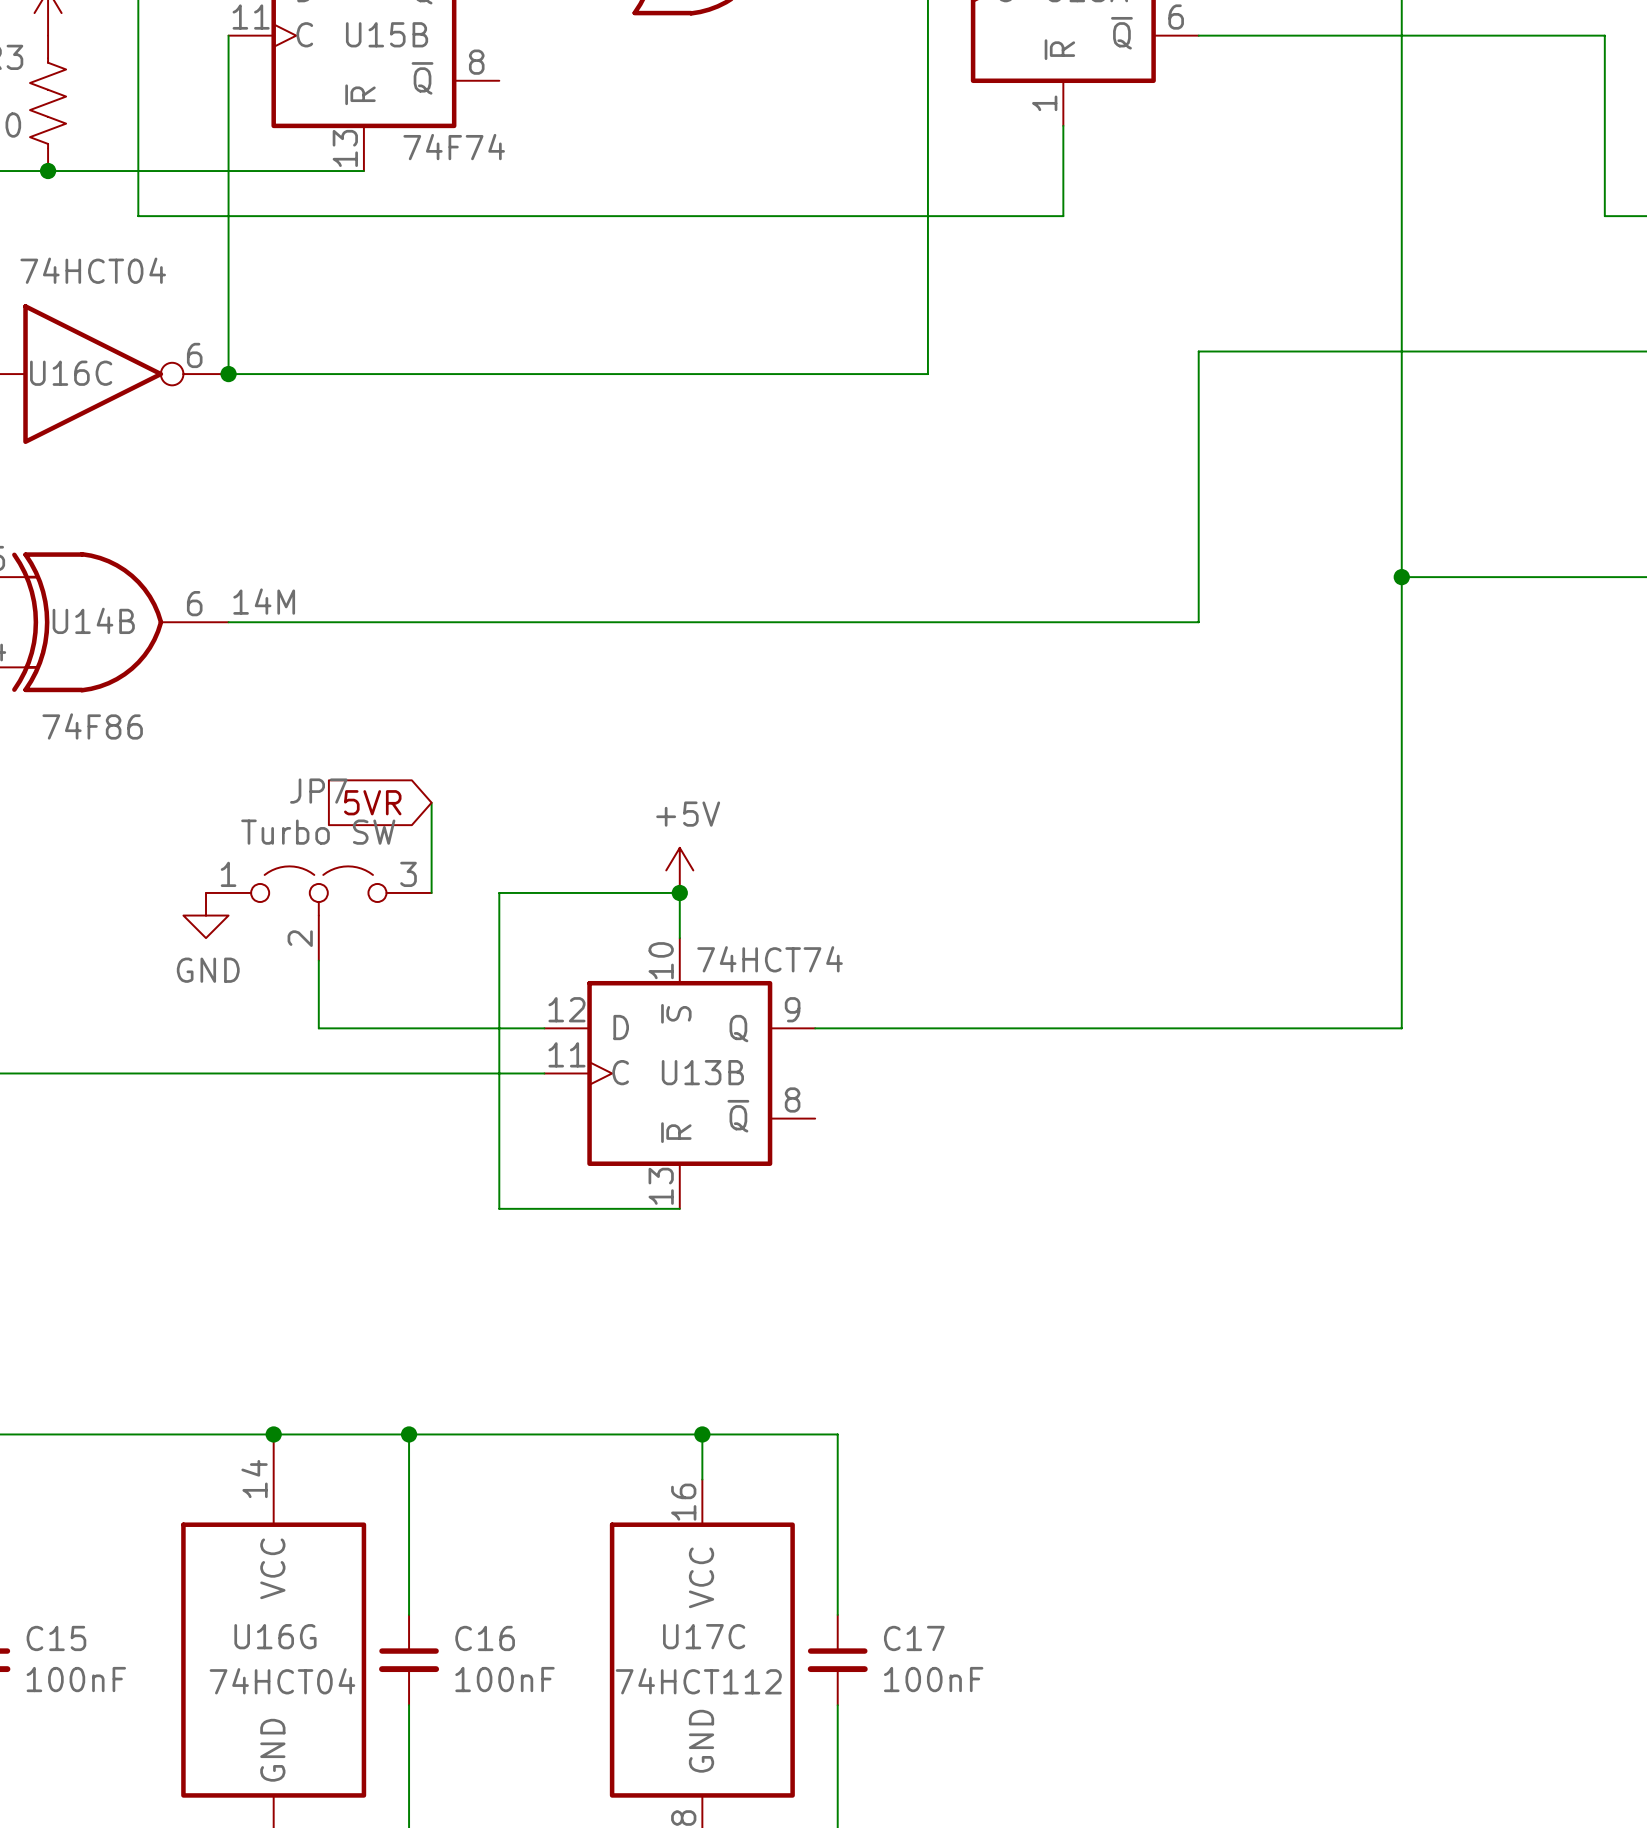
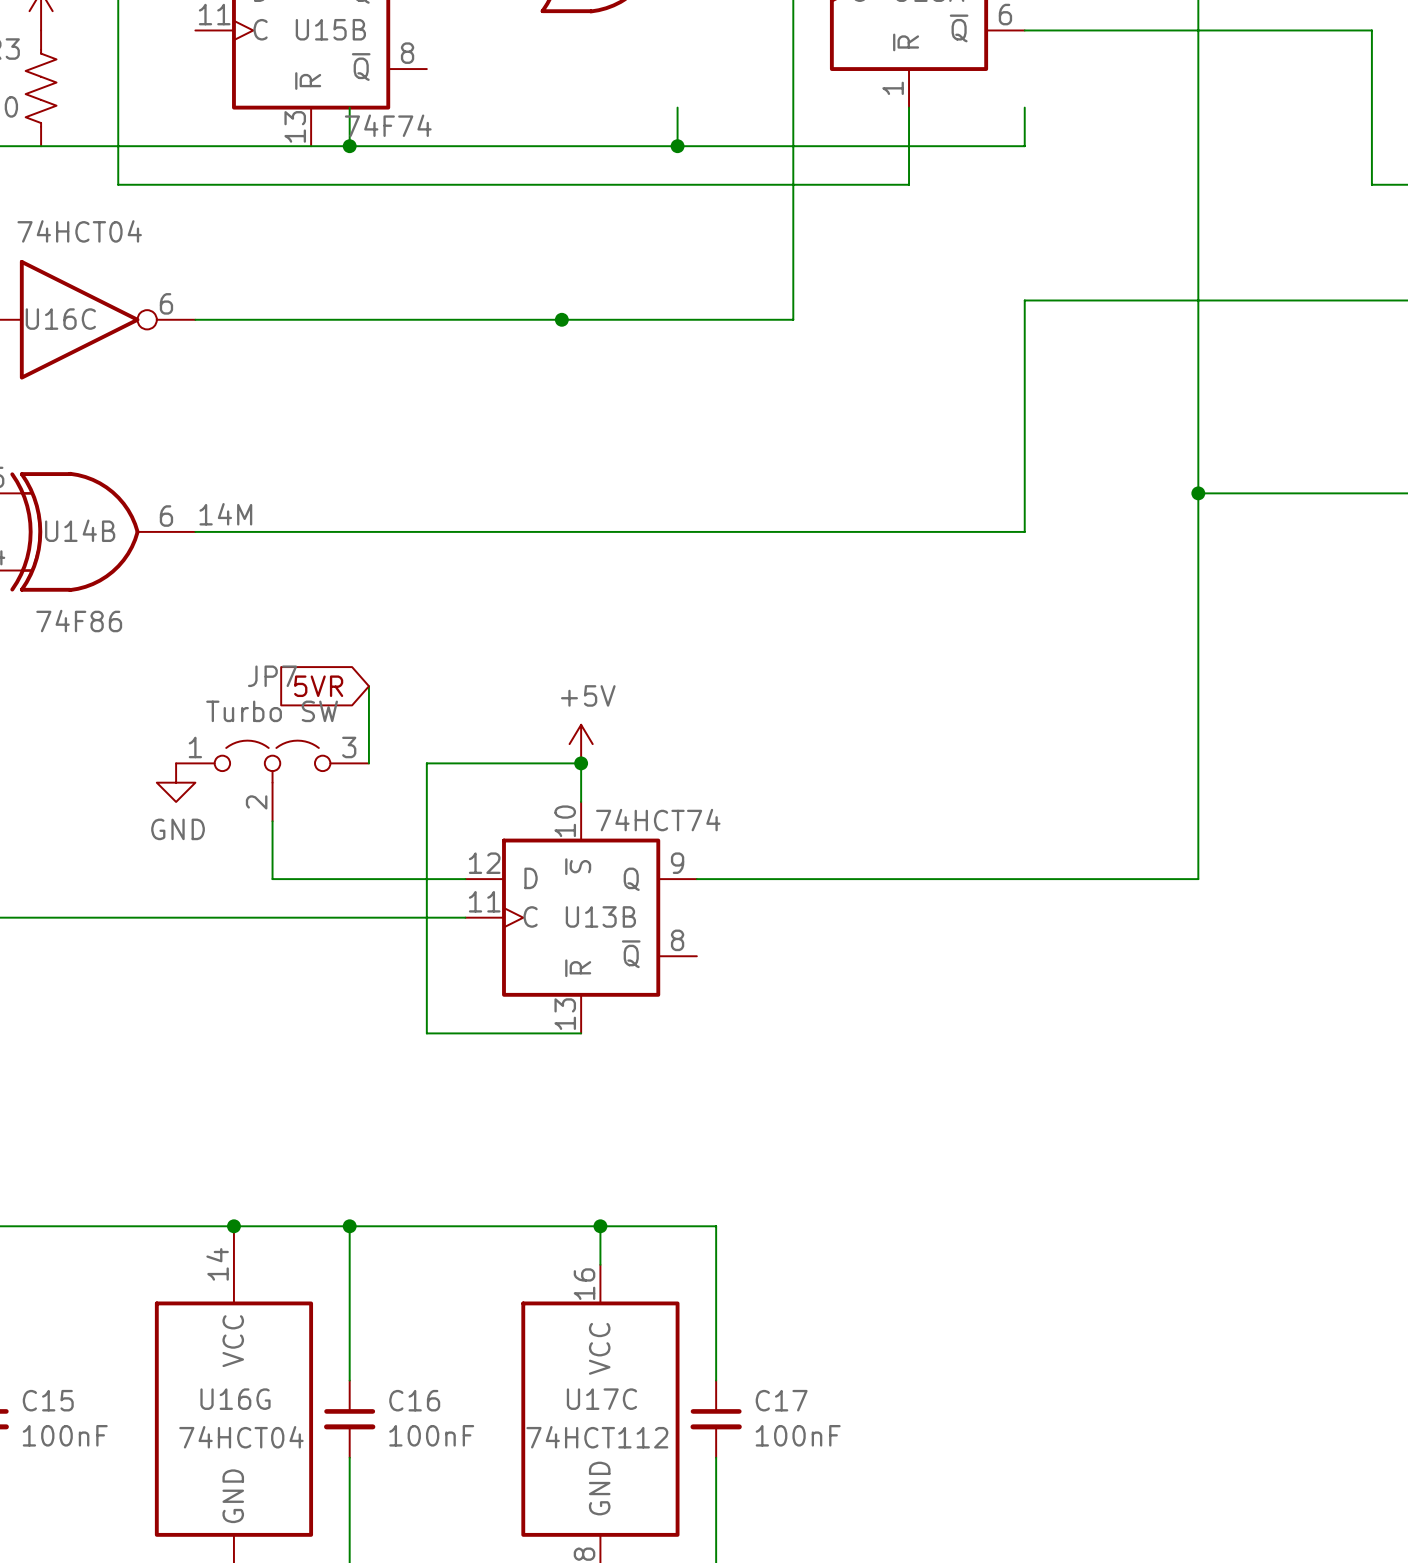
wire: (228, 35) (228, 374) -> none
wire: none -> (349, 107) (349, 146)
wire: none -> (677, 107) (677, 146)
wire: none -> (1024, 107) (1024, 146) (311, 146)
junction: (48, 171) -> none
junction: none -> (349, 146)
junction: none -> (677, 146)
junction: (228, 374) -> none
junction: none -> (561, 319)

